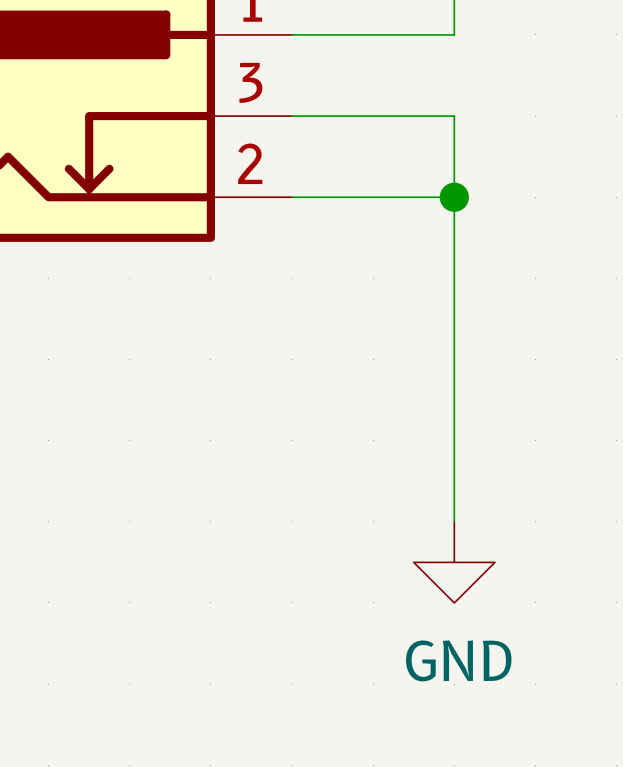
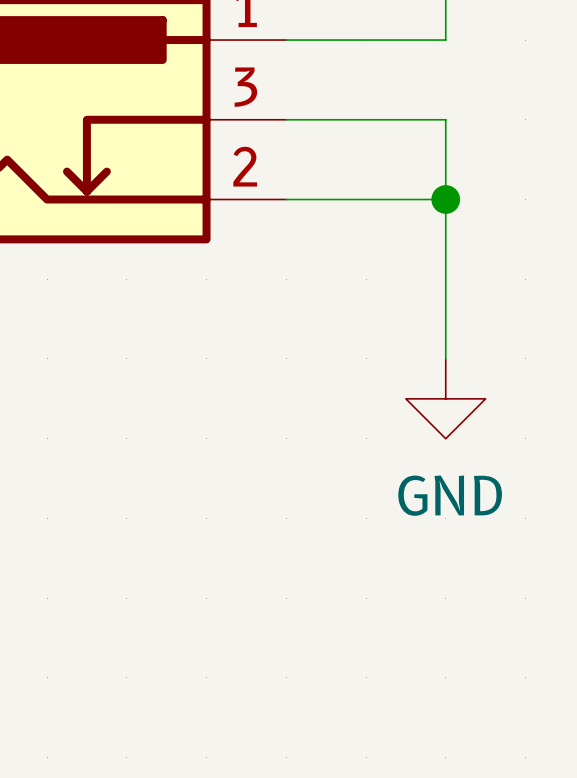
wire: (454, 359) (454, 521) -> none
power symbol position: GND (454, 562) -> GND (445, 398)

